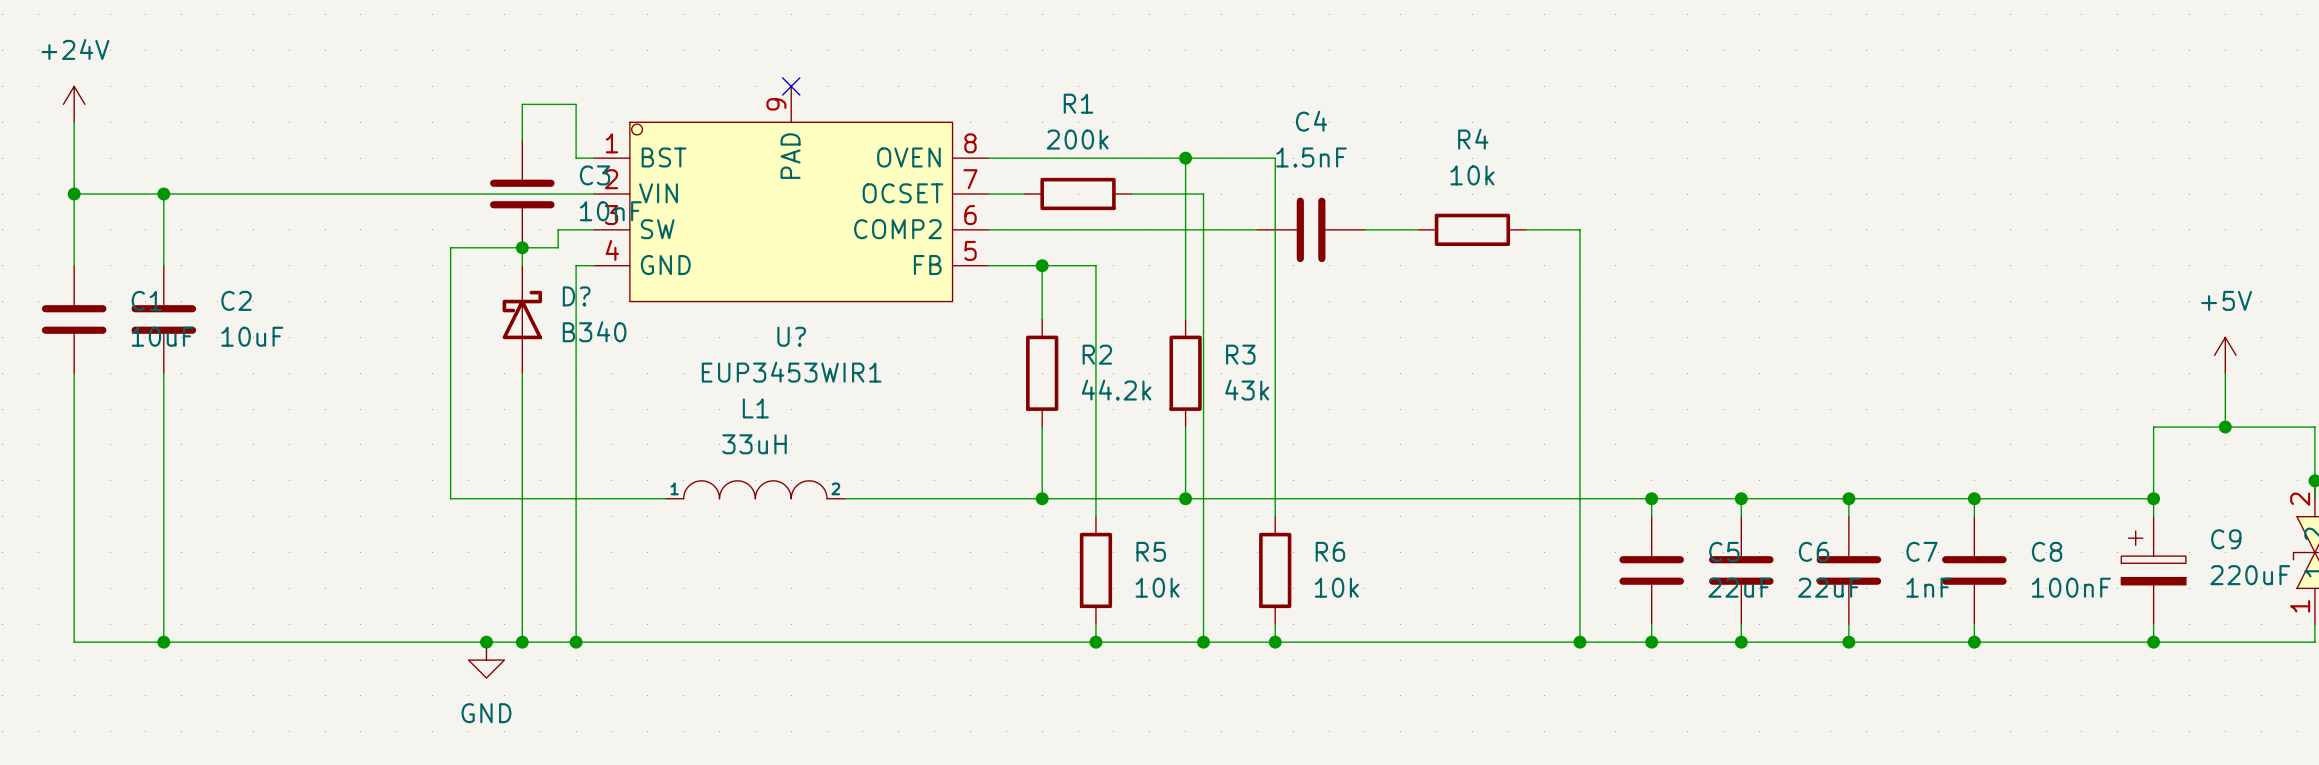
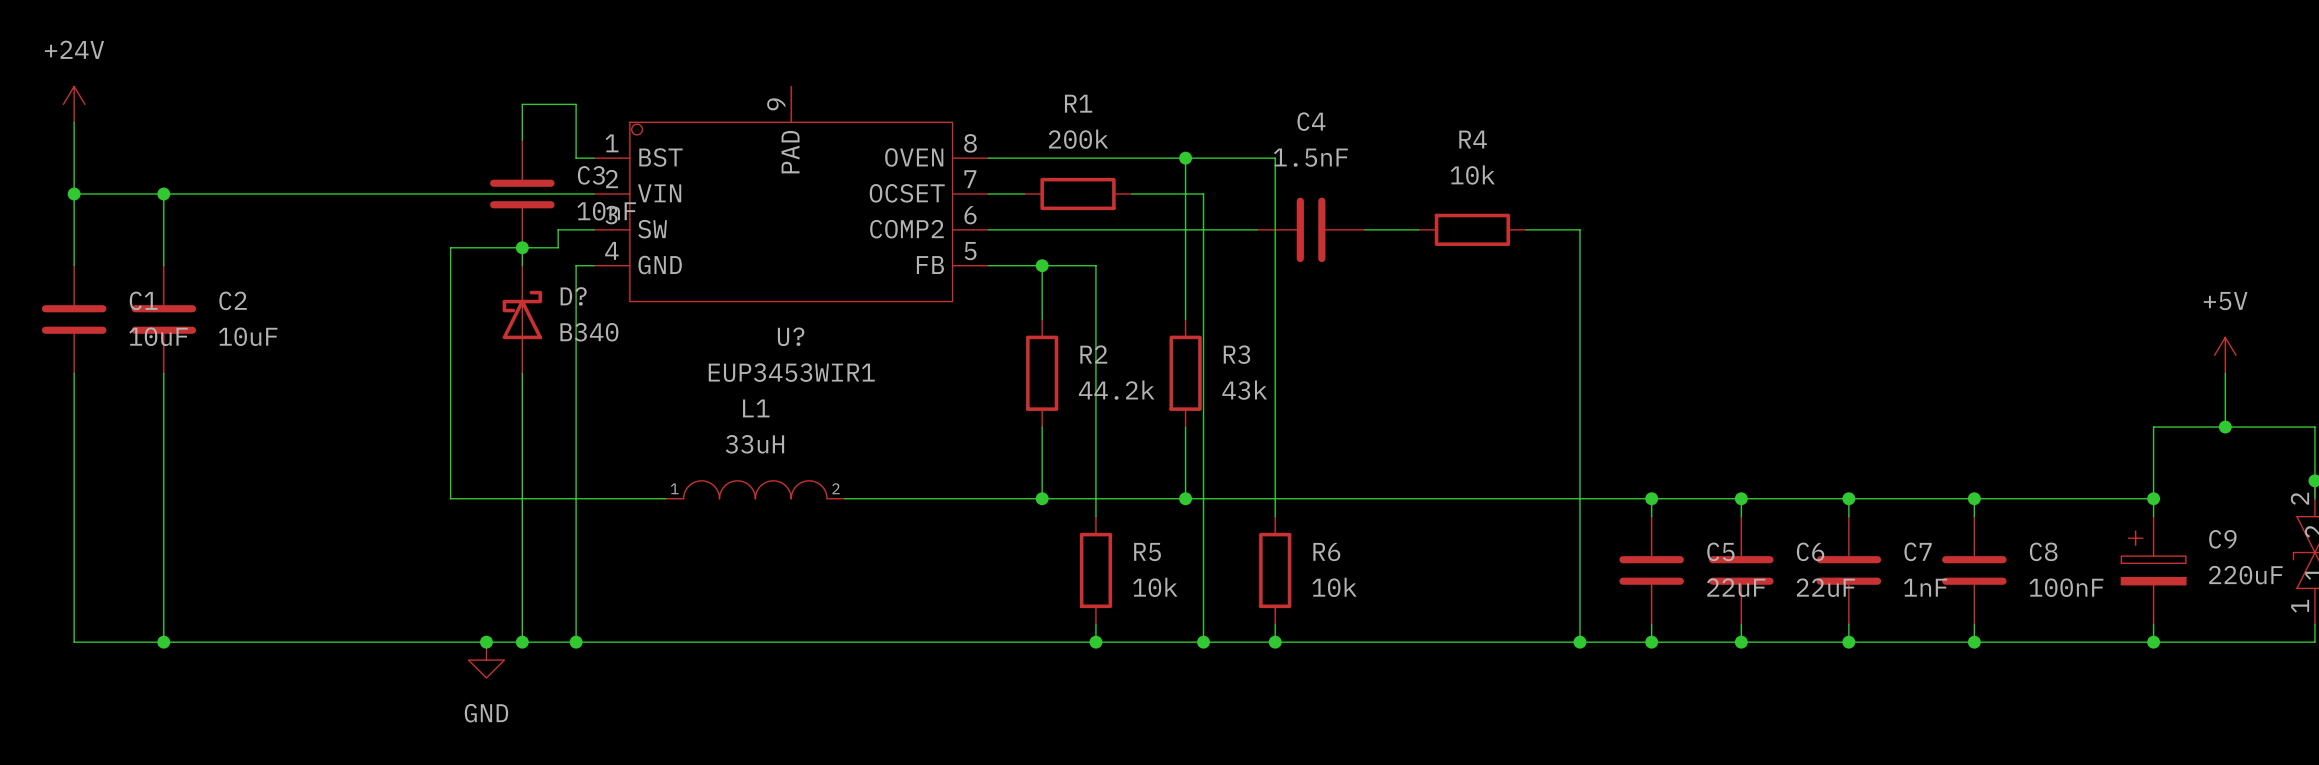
no-connect mark: (791, 86) -> none

